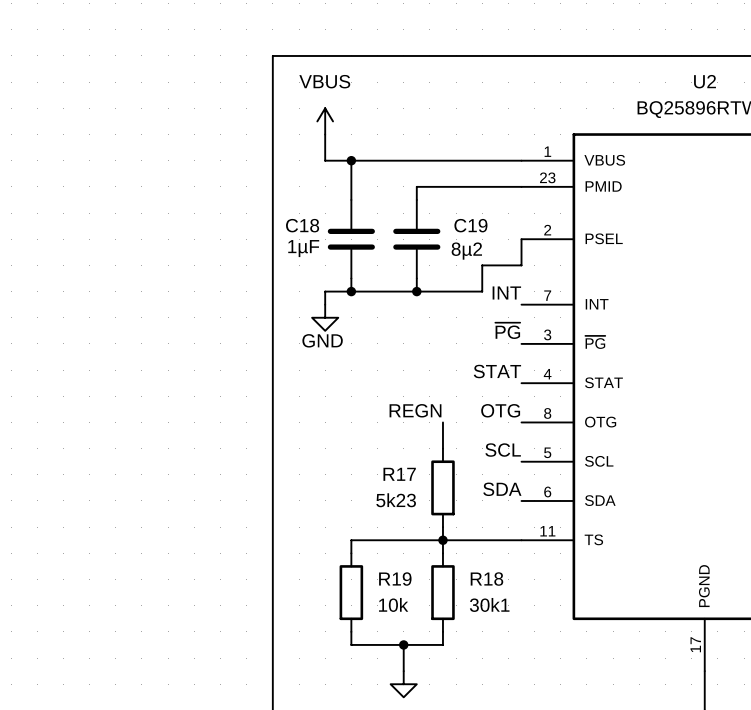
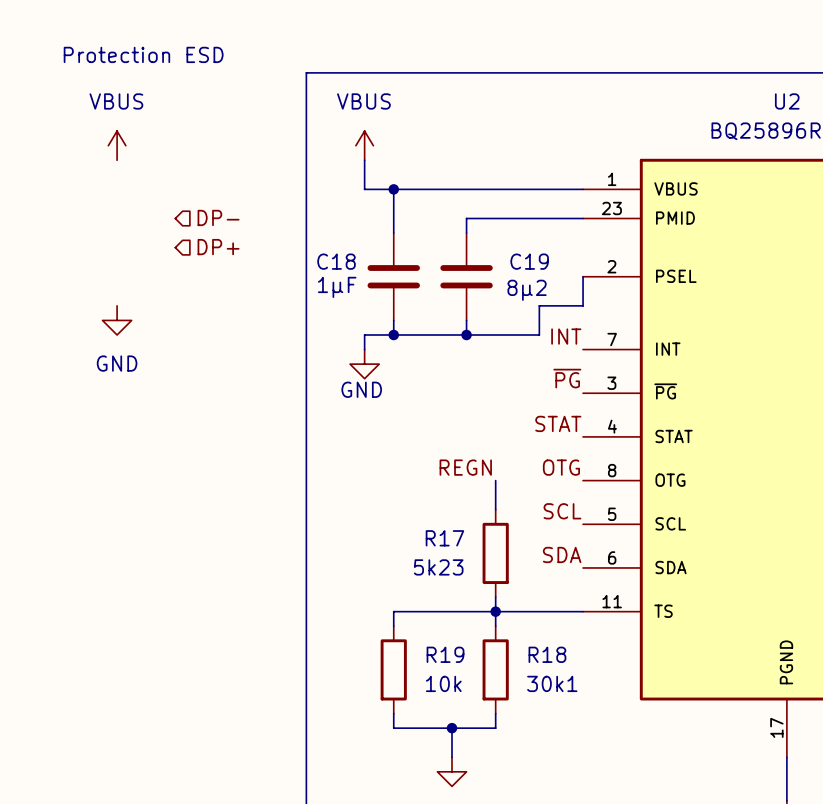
text: none -> Protection ESD (143, 54)
power symbol: none -> VBUS (117, 145)
hierarchical label: none -> DP- (218, 217)
hierarchical label: none -> DP+ (218, 247)
power symbol: none -> GND (117, 320)

